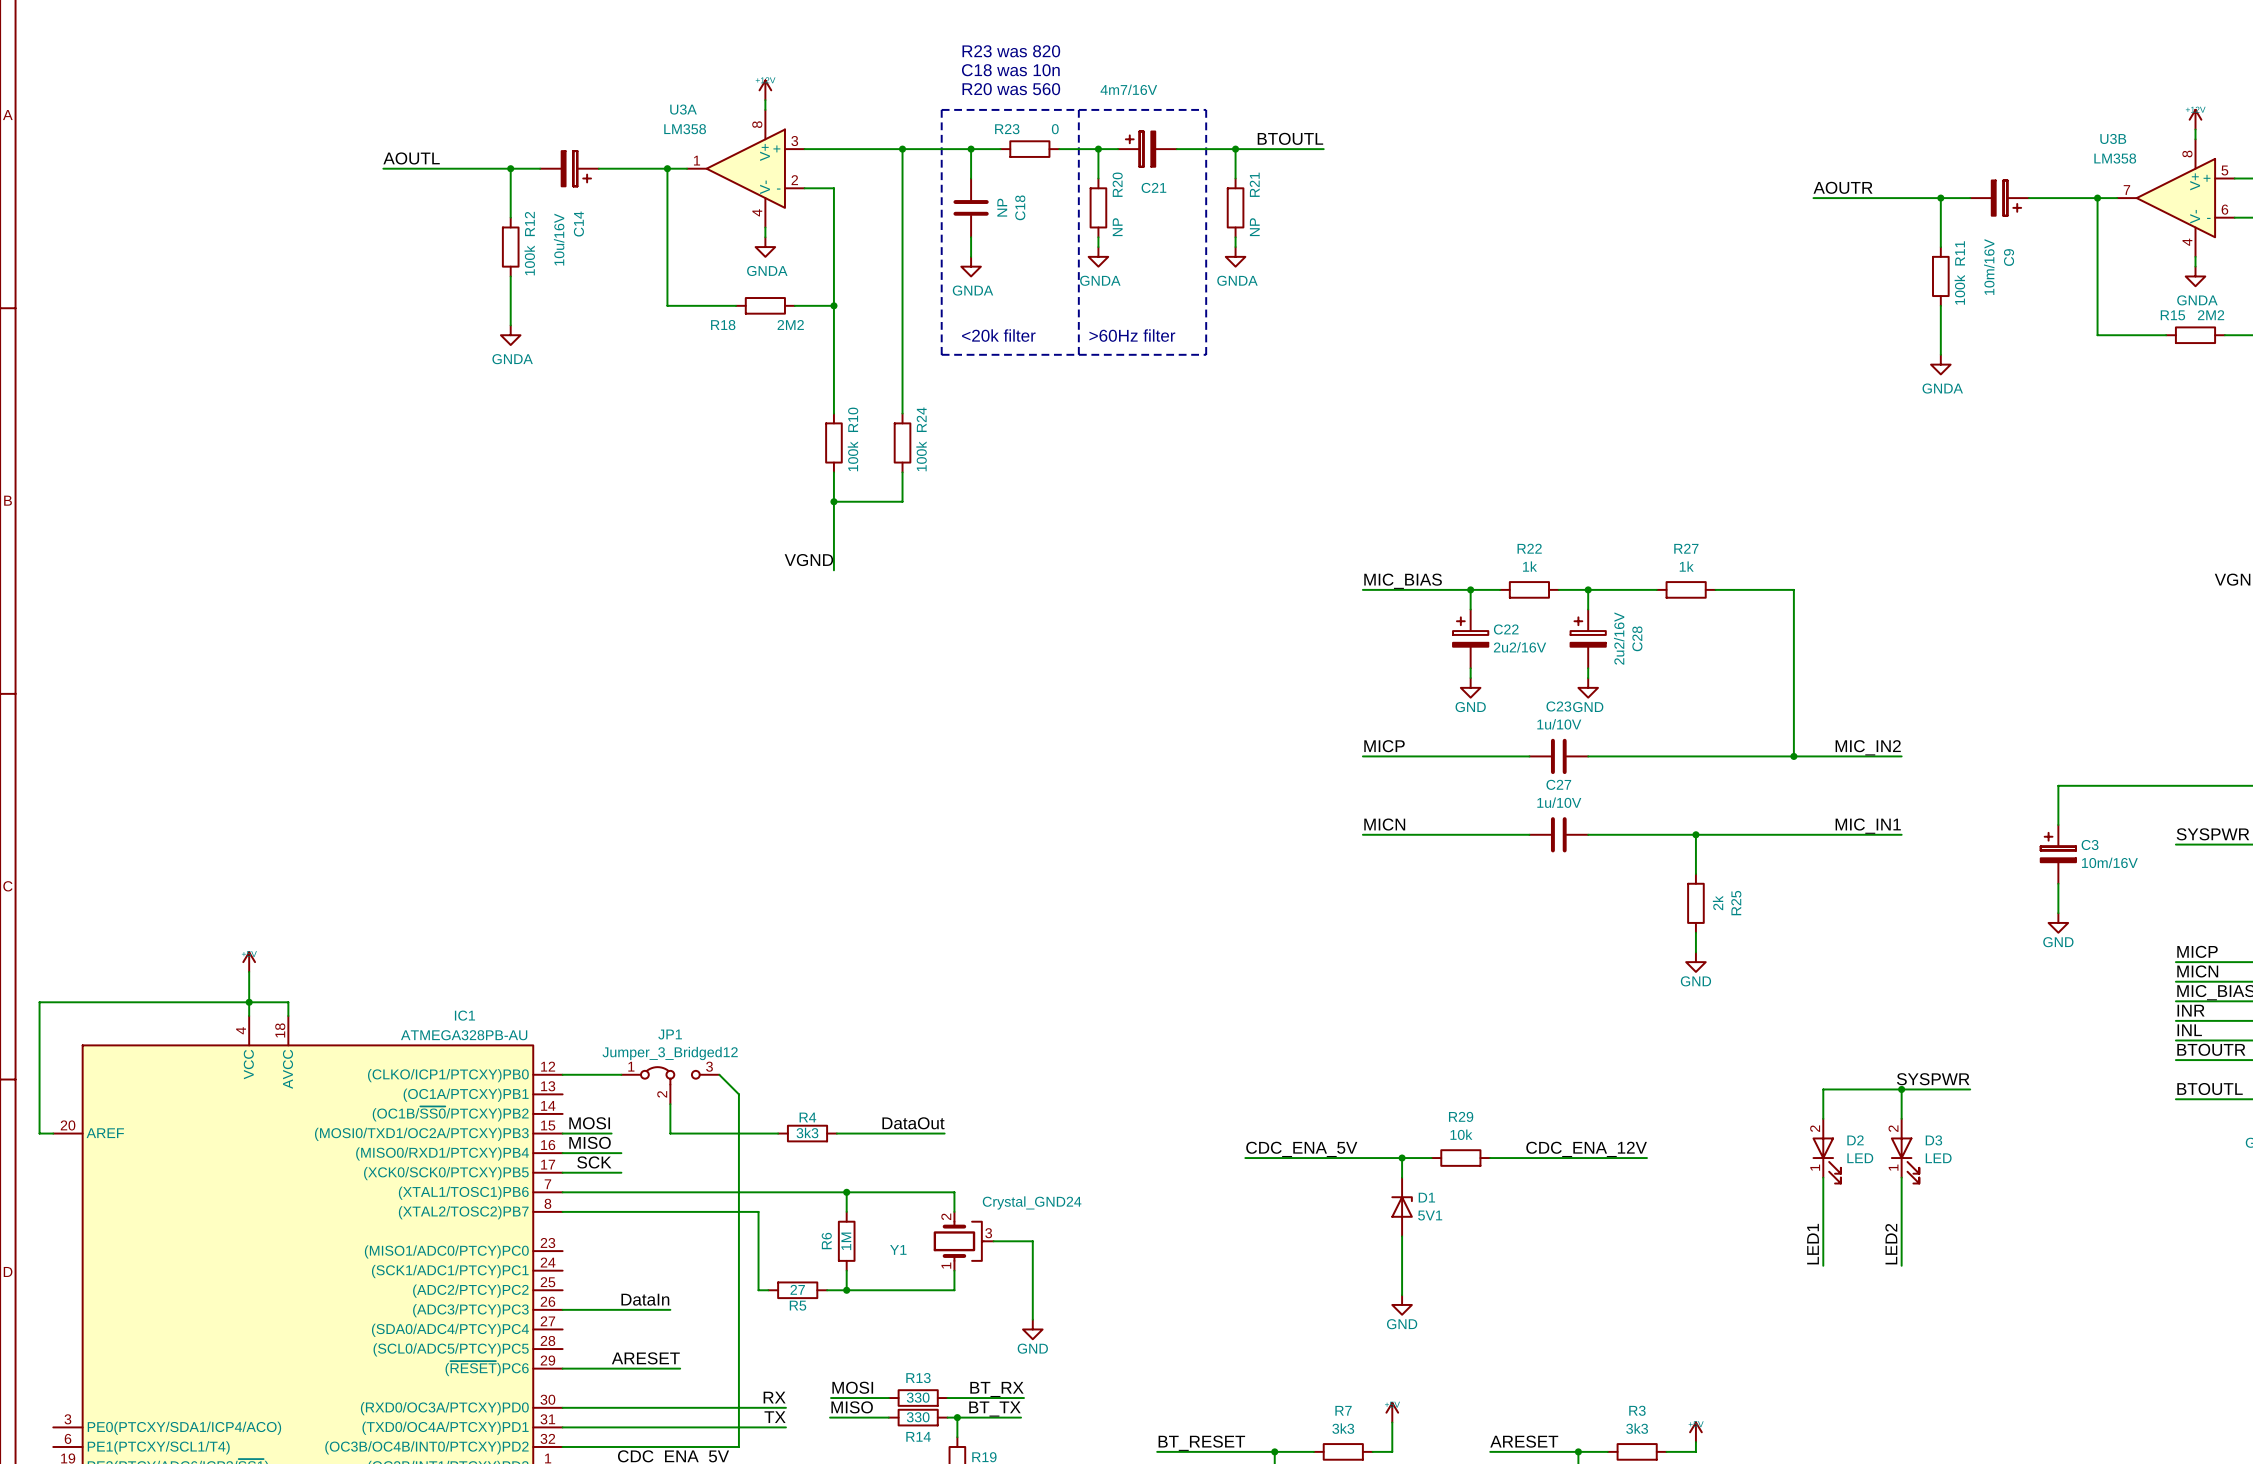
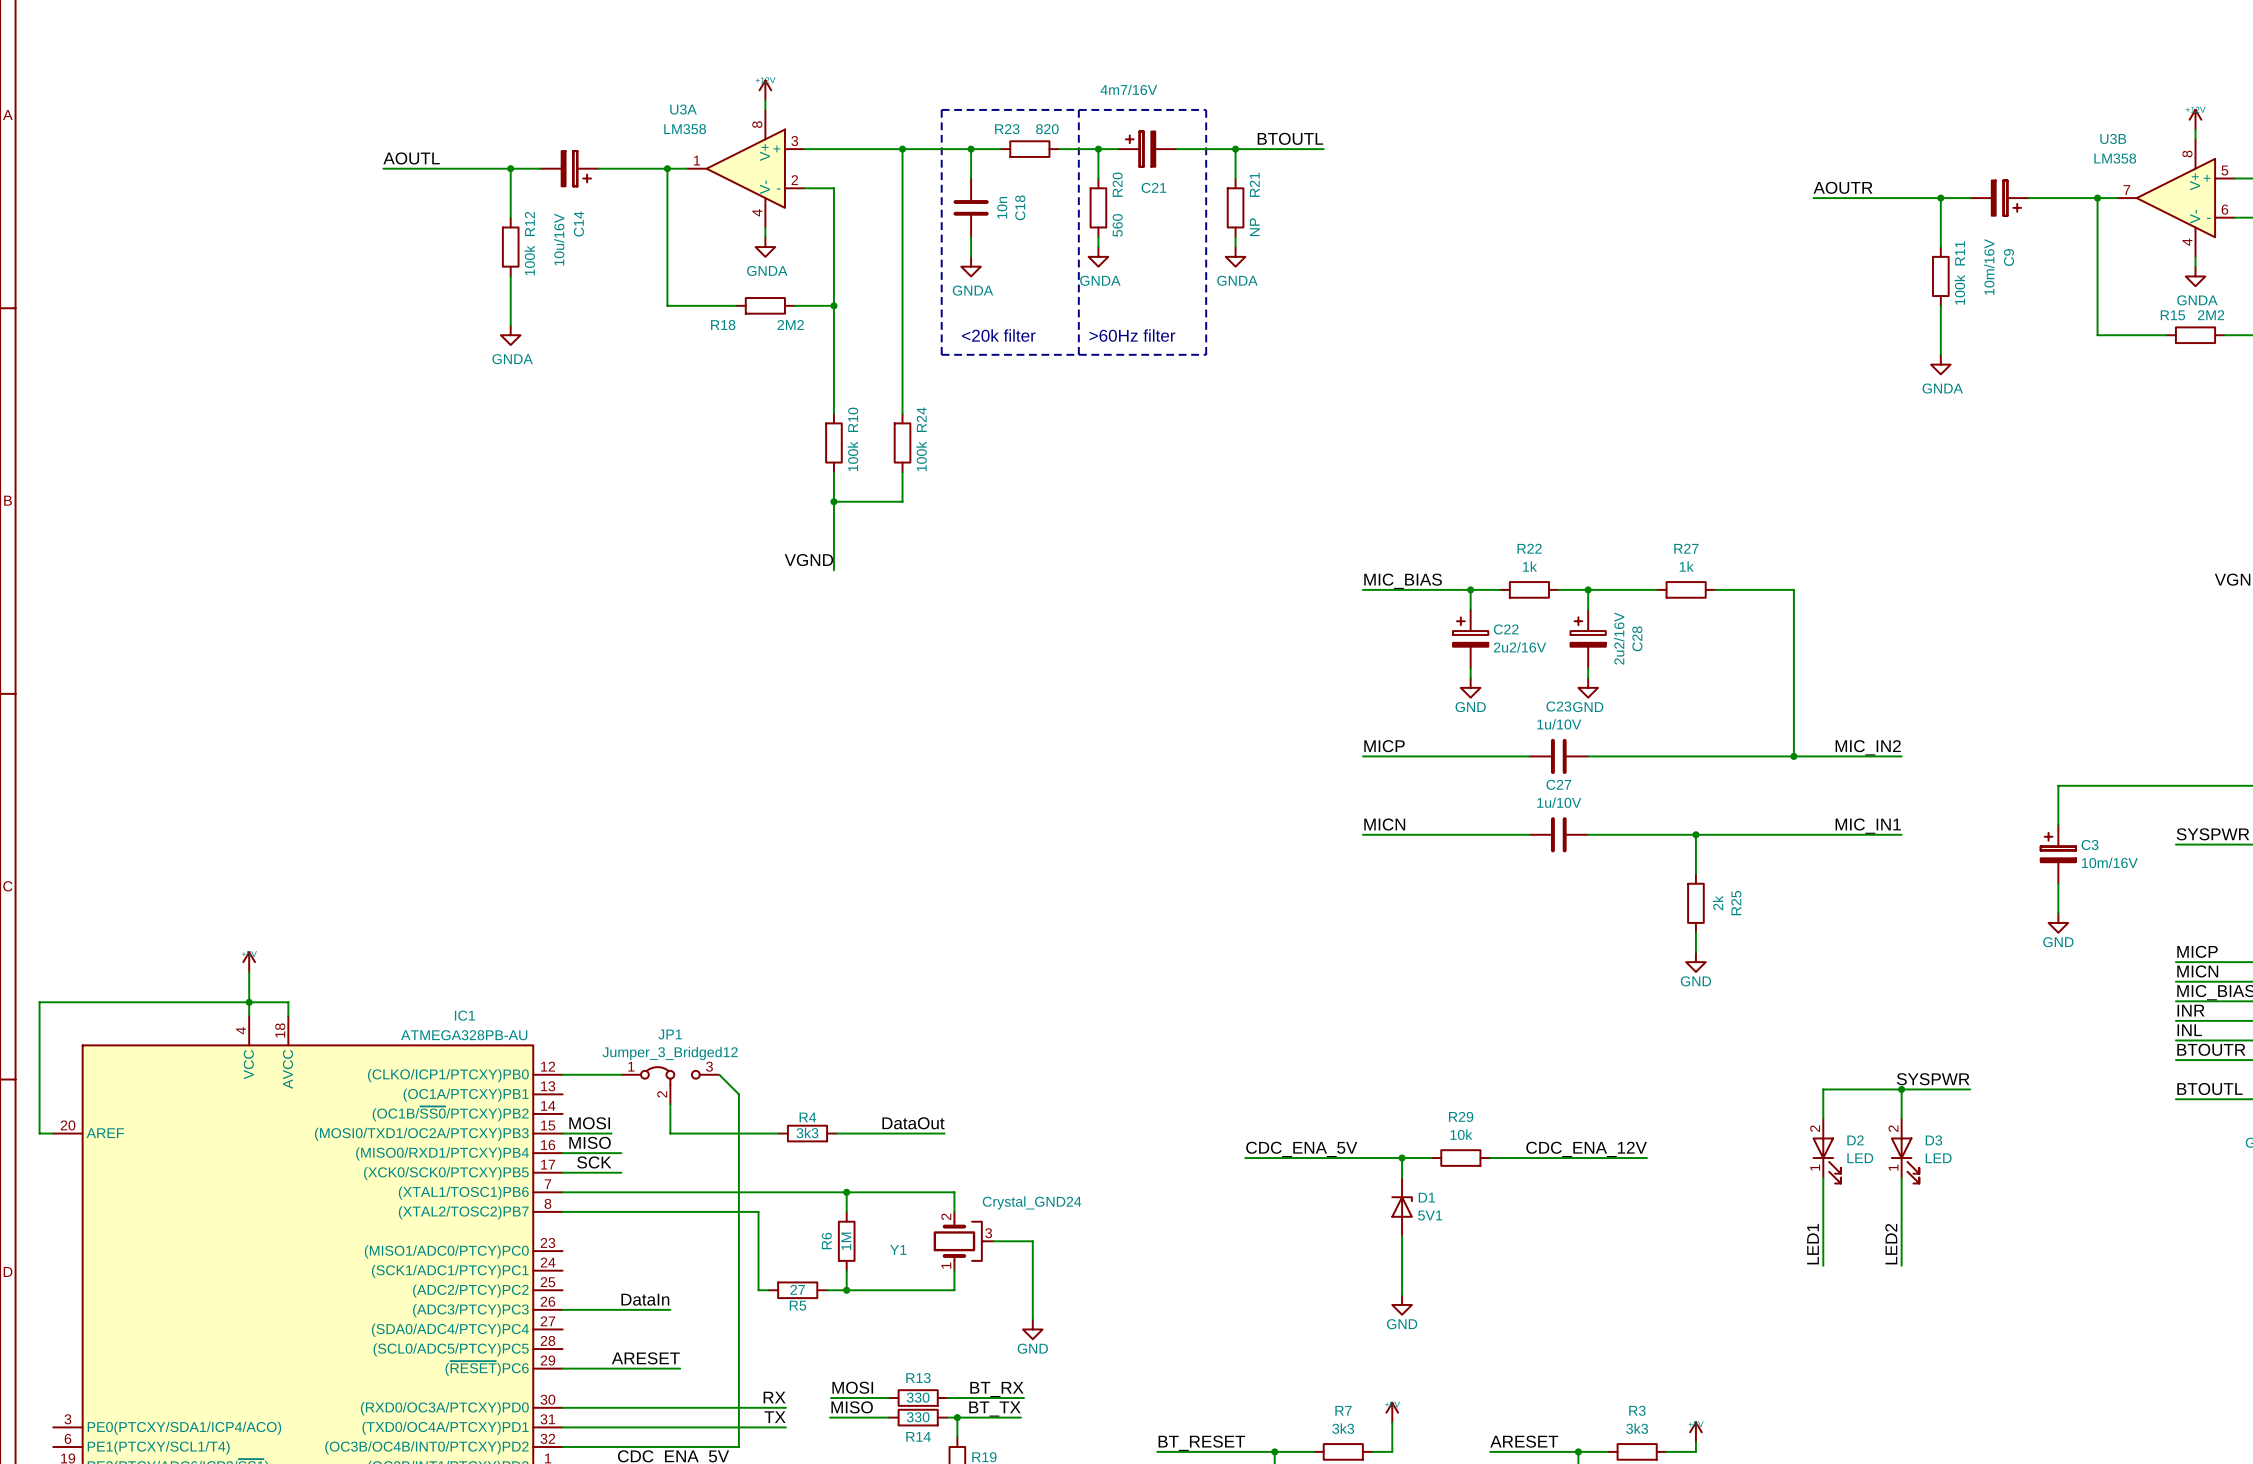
text: R23 was 820 (1011, 51) -> none
text: C18 was 10n (1010, 70) -> none
text: R20 was 560 (1011, 89) -> none
R23 value: 0 (1055, 129) -> 820 (1047, 129)
C18 value: NP (1002, 207) -> 10n (1002, 207)
R20 value: NP (1117, 227) -> 560 (1117, 225)

